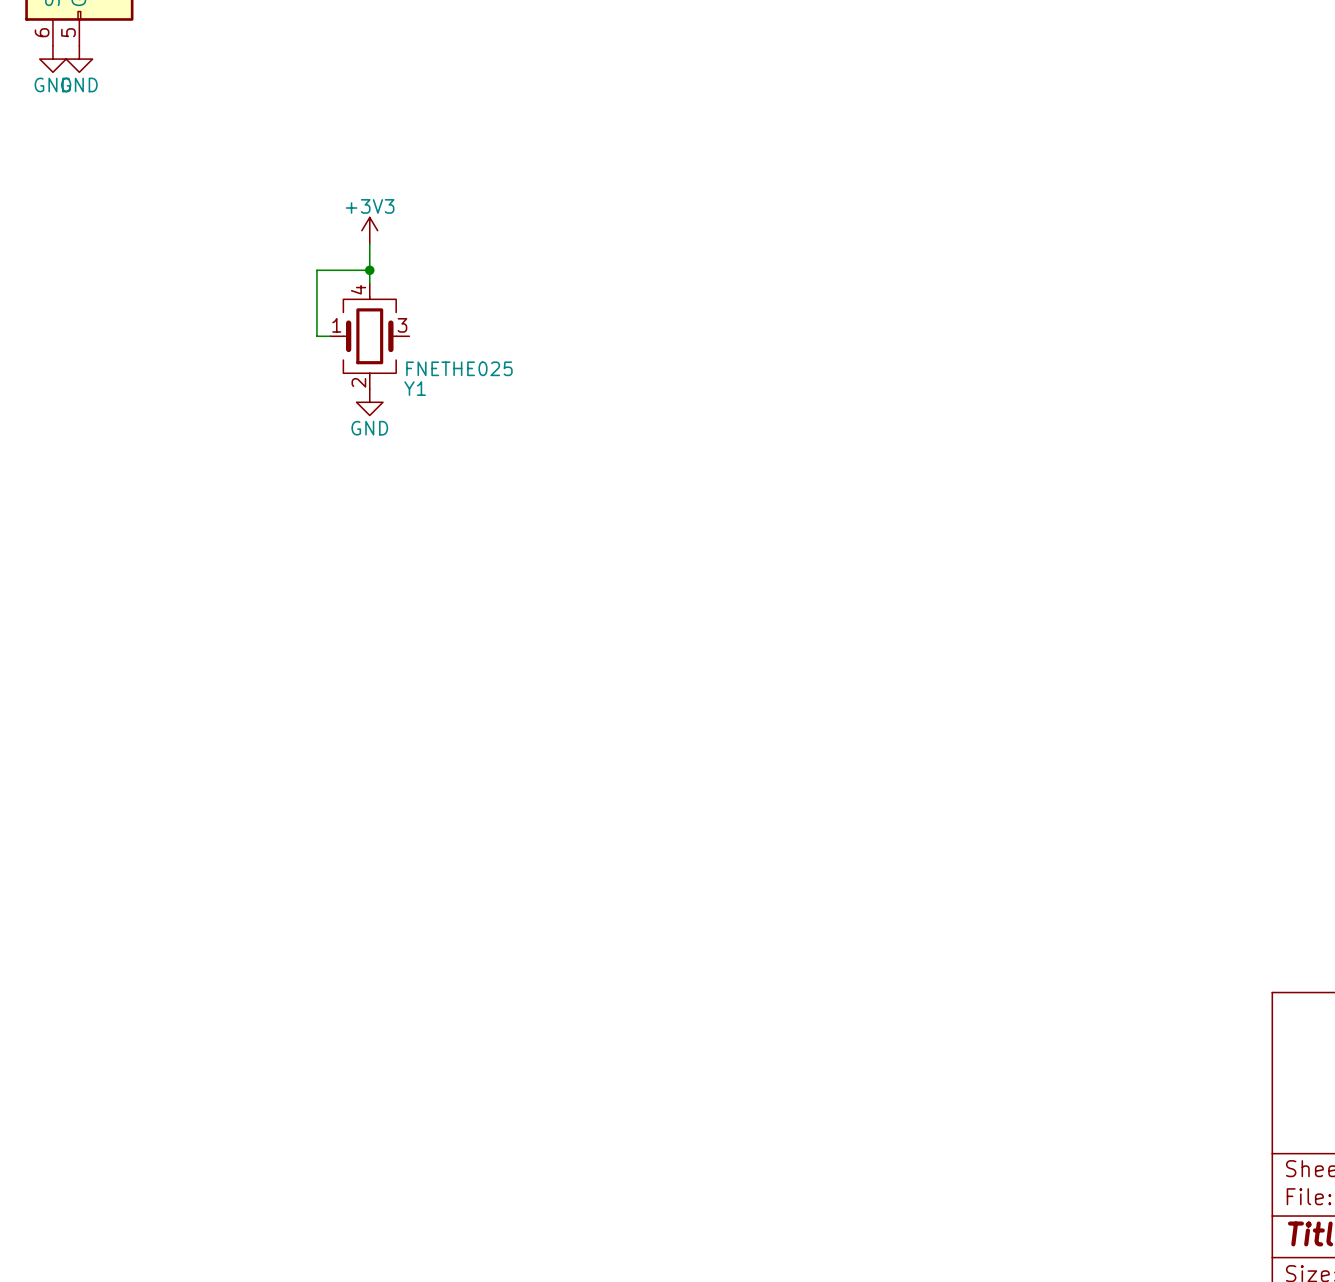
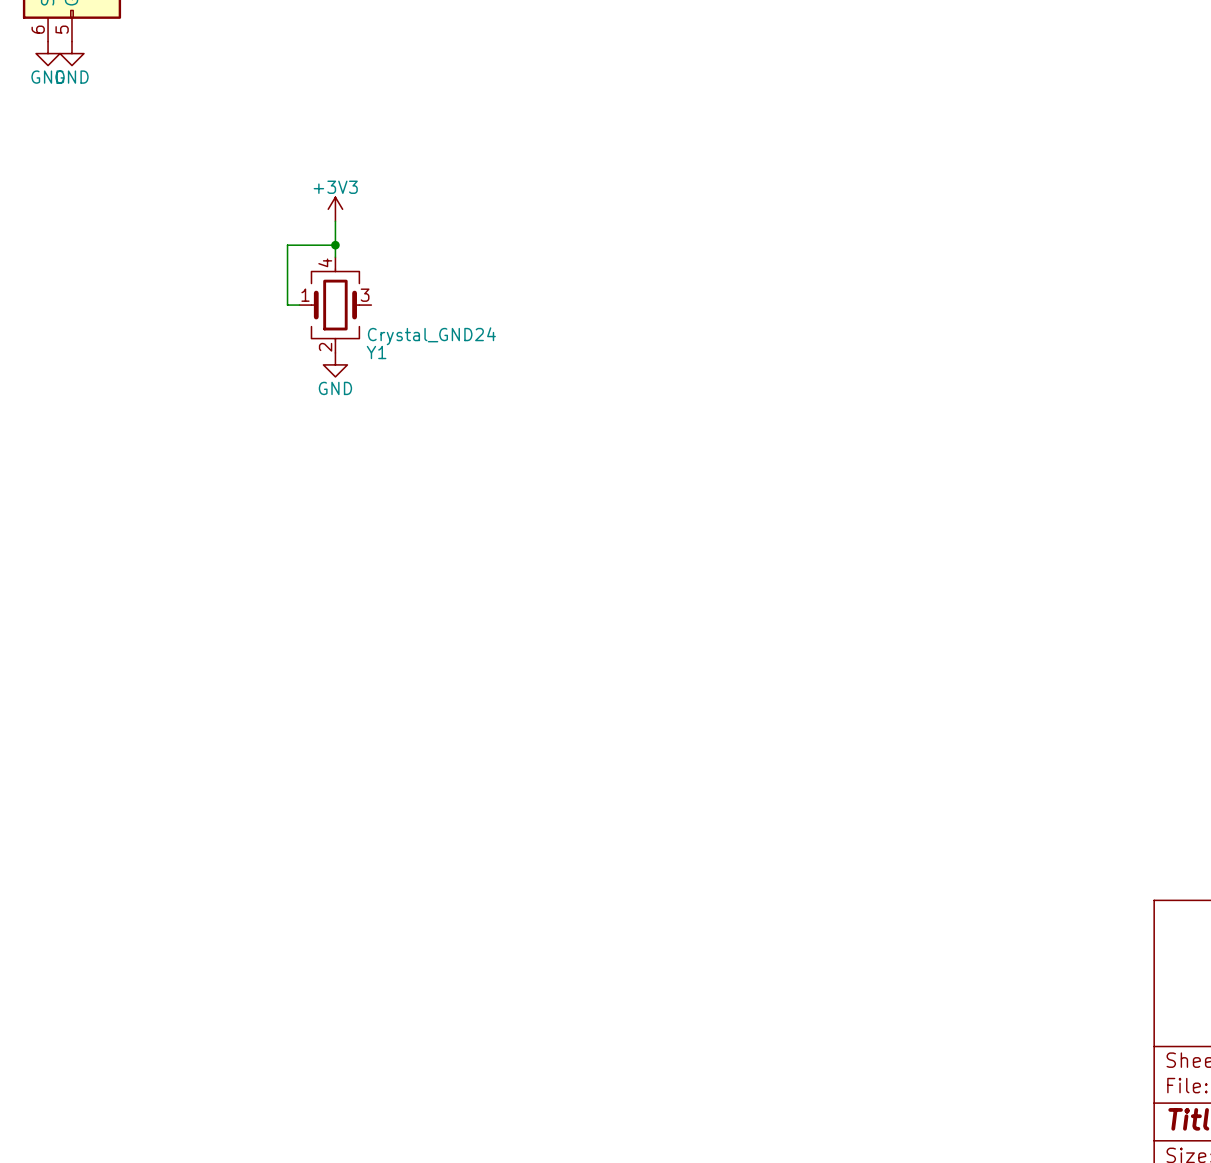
Y1 value: FNETHE025 (459, 368) -> Crystal_GND24 (431, 336)

